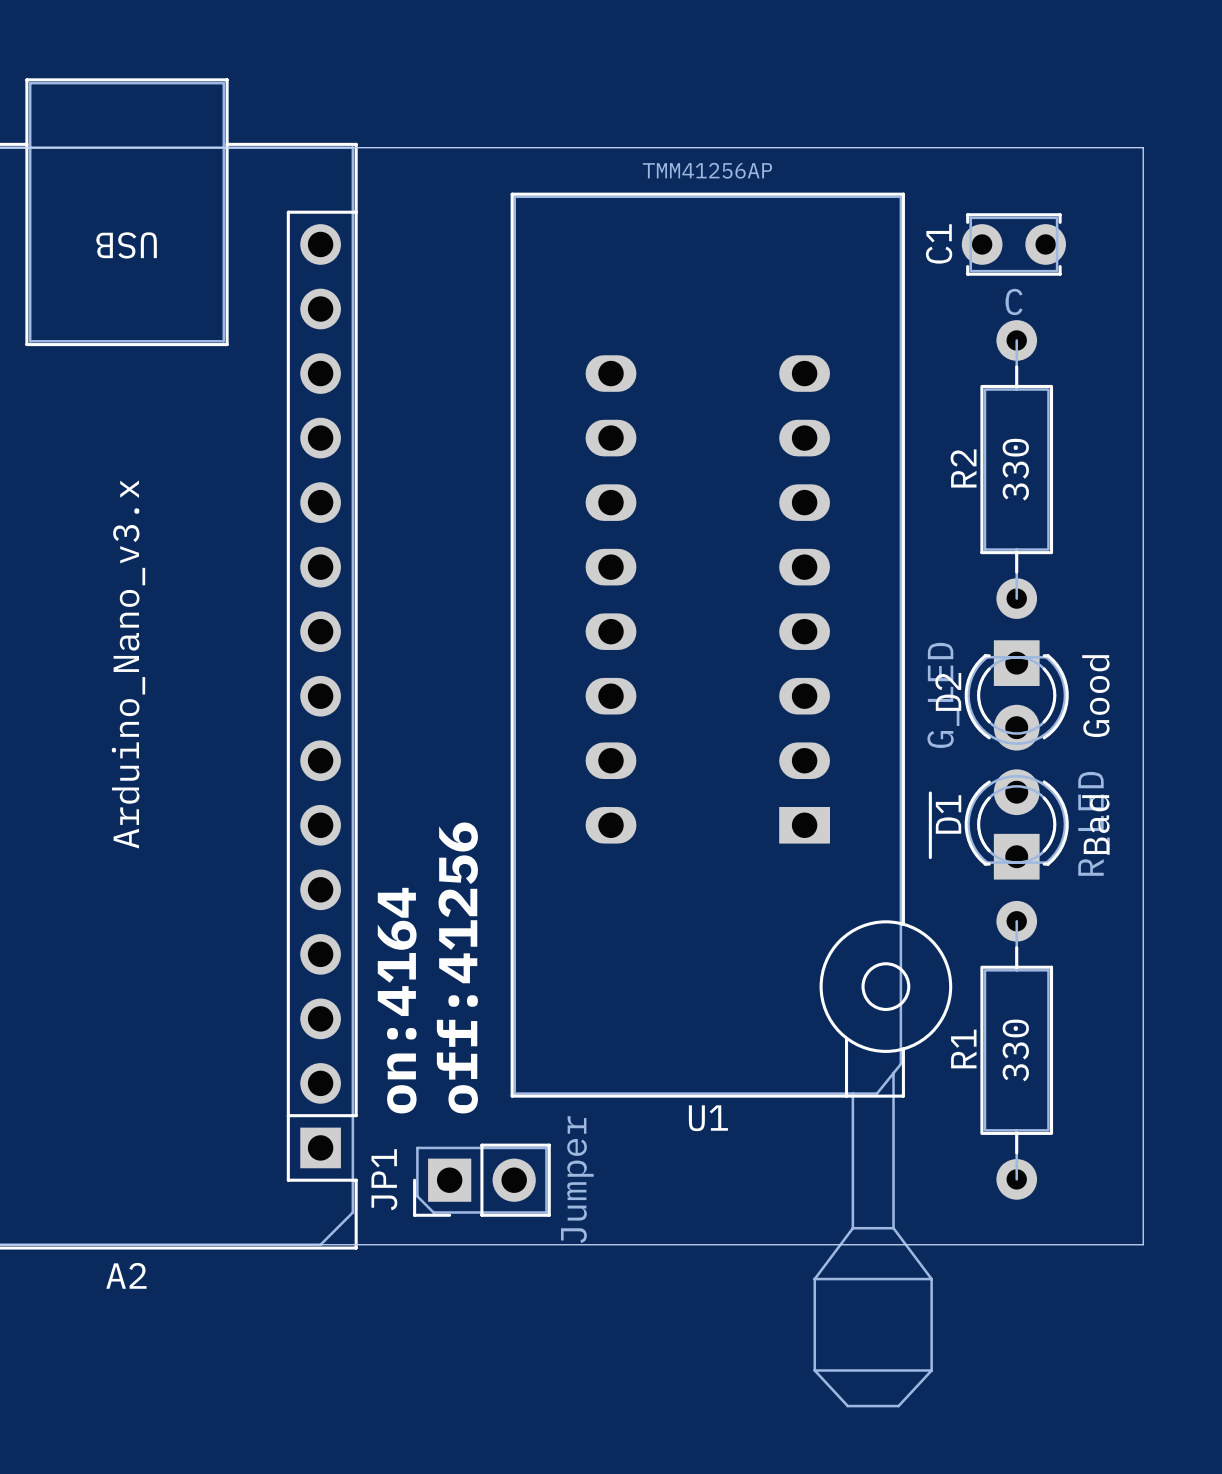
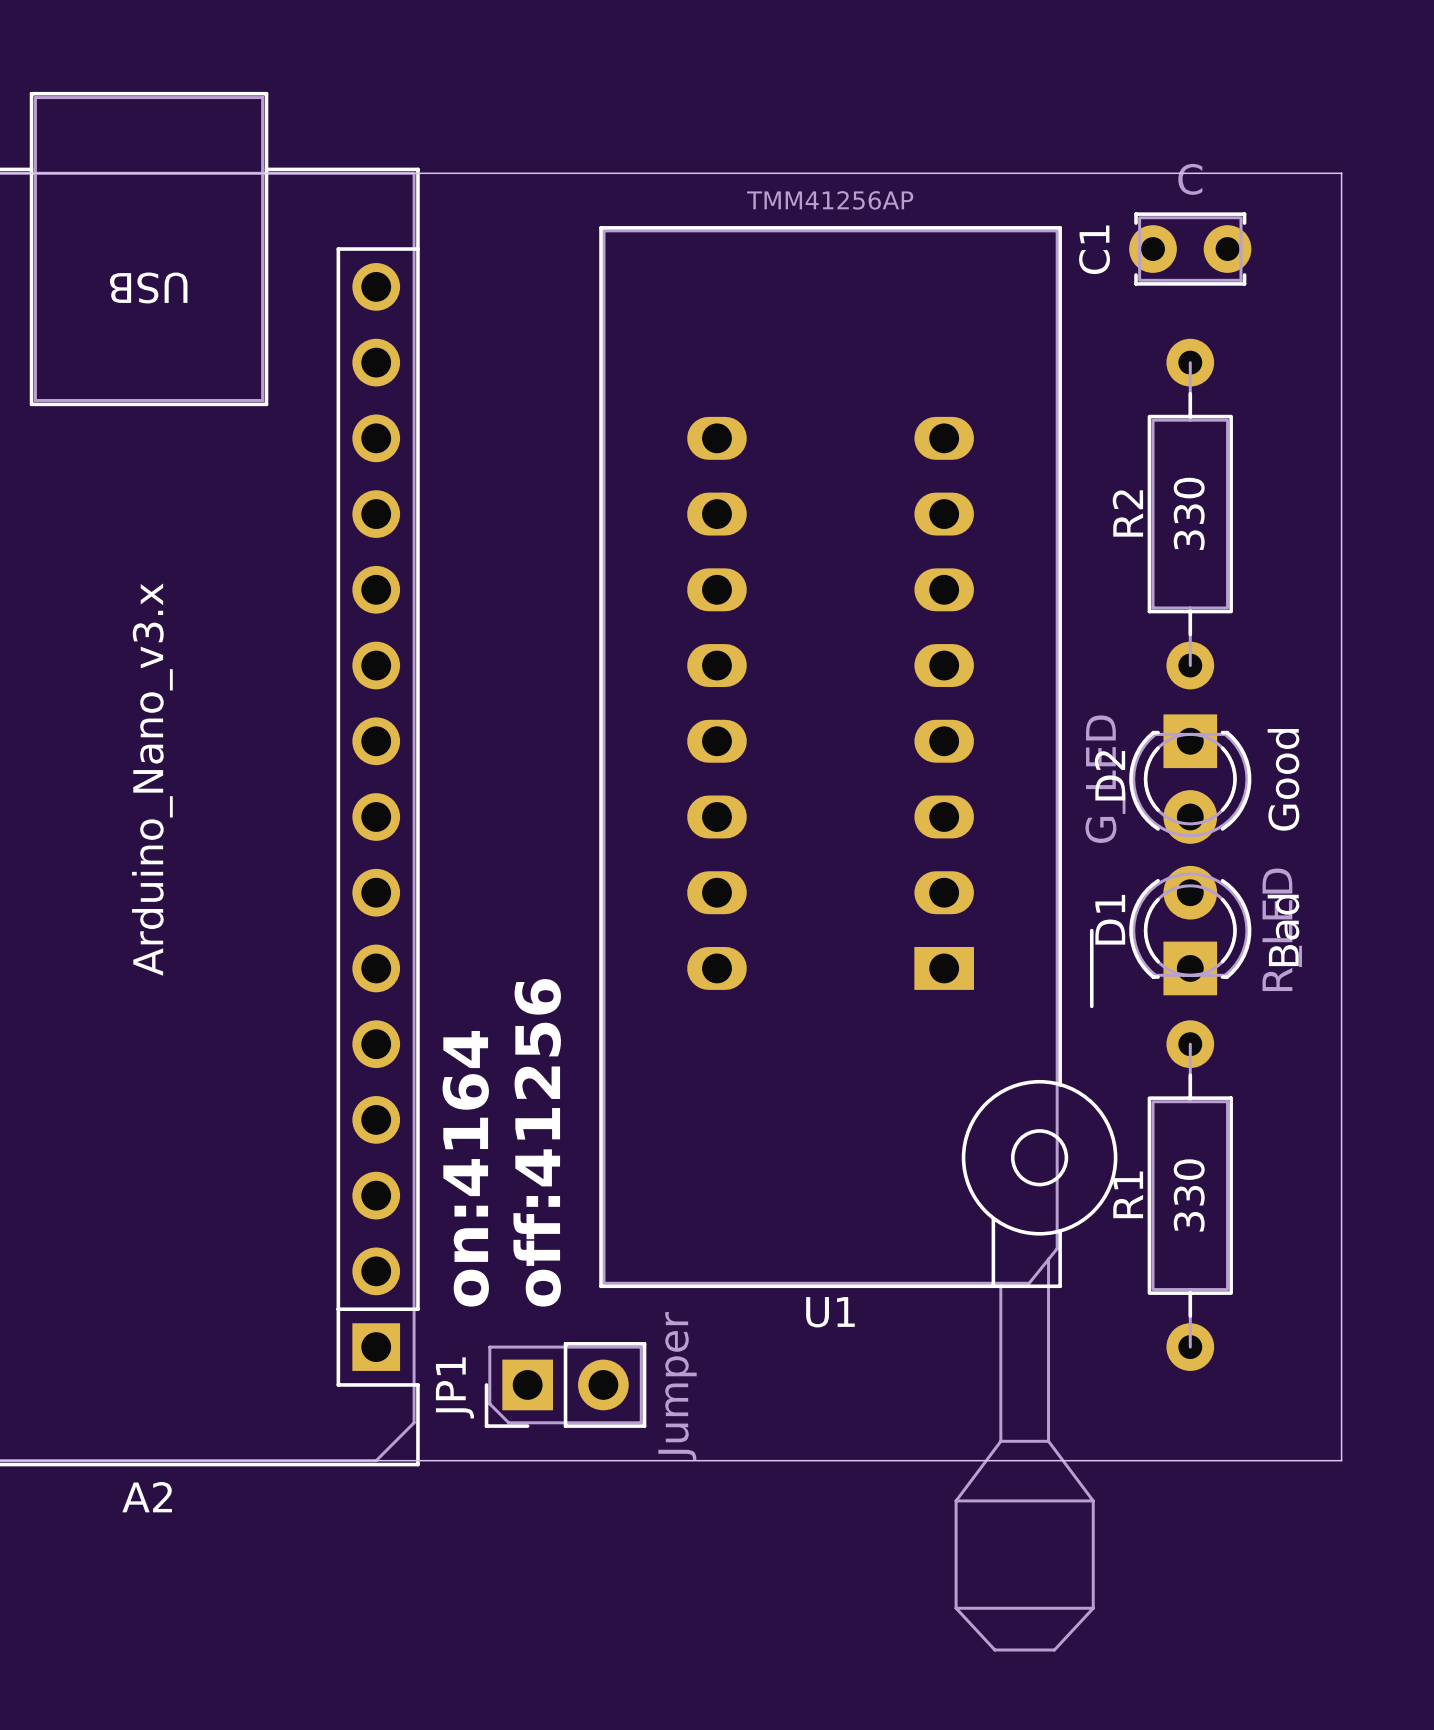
C1 name position: C1 (939, 243) -> C1 (1094, 249)
C1 position: (1013, 244) -> (1190, 249)
C1 value position: C (1014, 301) -> C (1190, 179)
R2 position: (1016, 469) -> (1190, 514)
D2 position: (1016, 695) -> (1190, 779)
D1 position: (1016, 824) -> (1190, 930)
R1 position: (1016, 1050) -> (1190, 1195)

